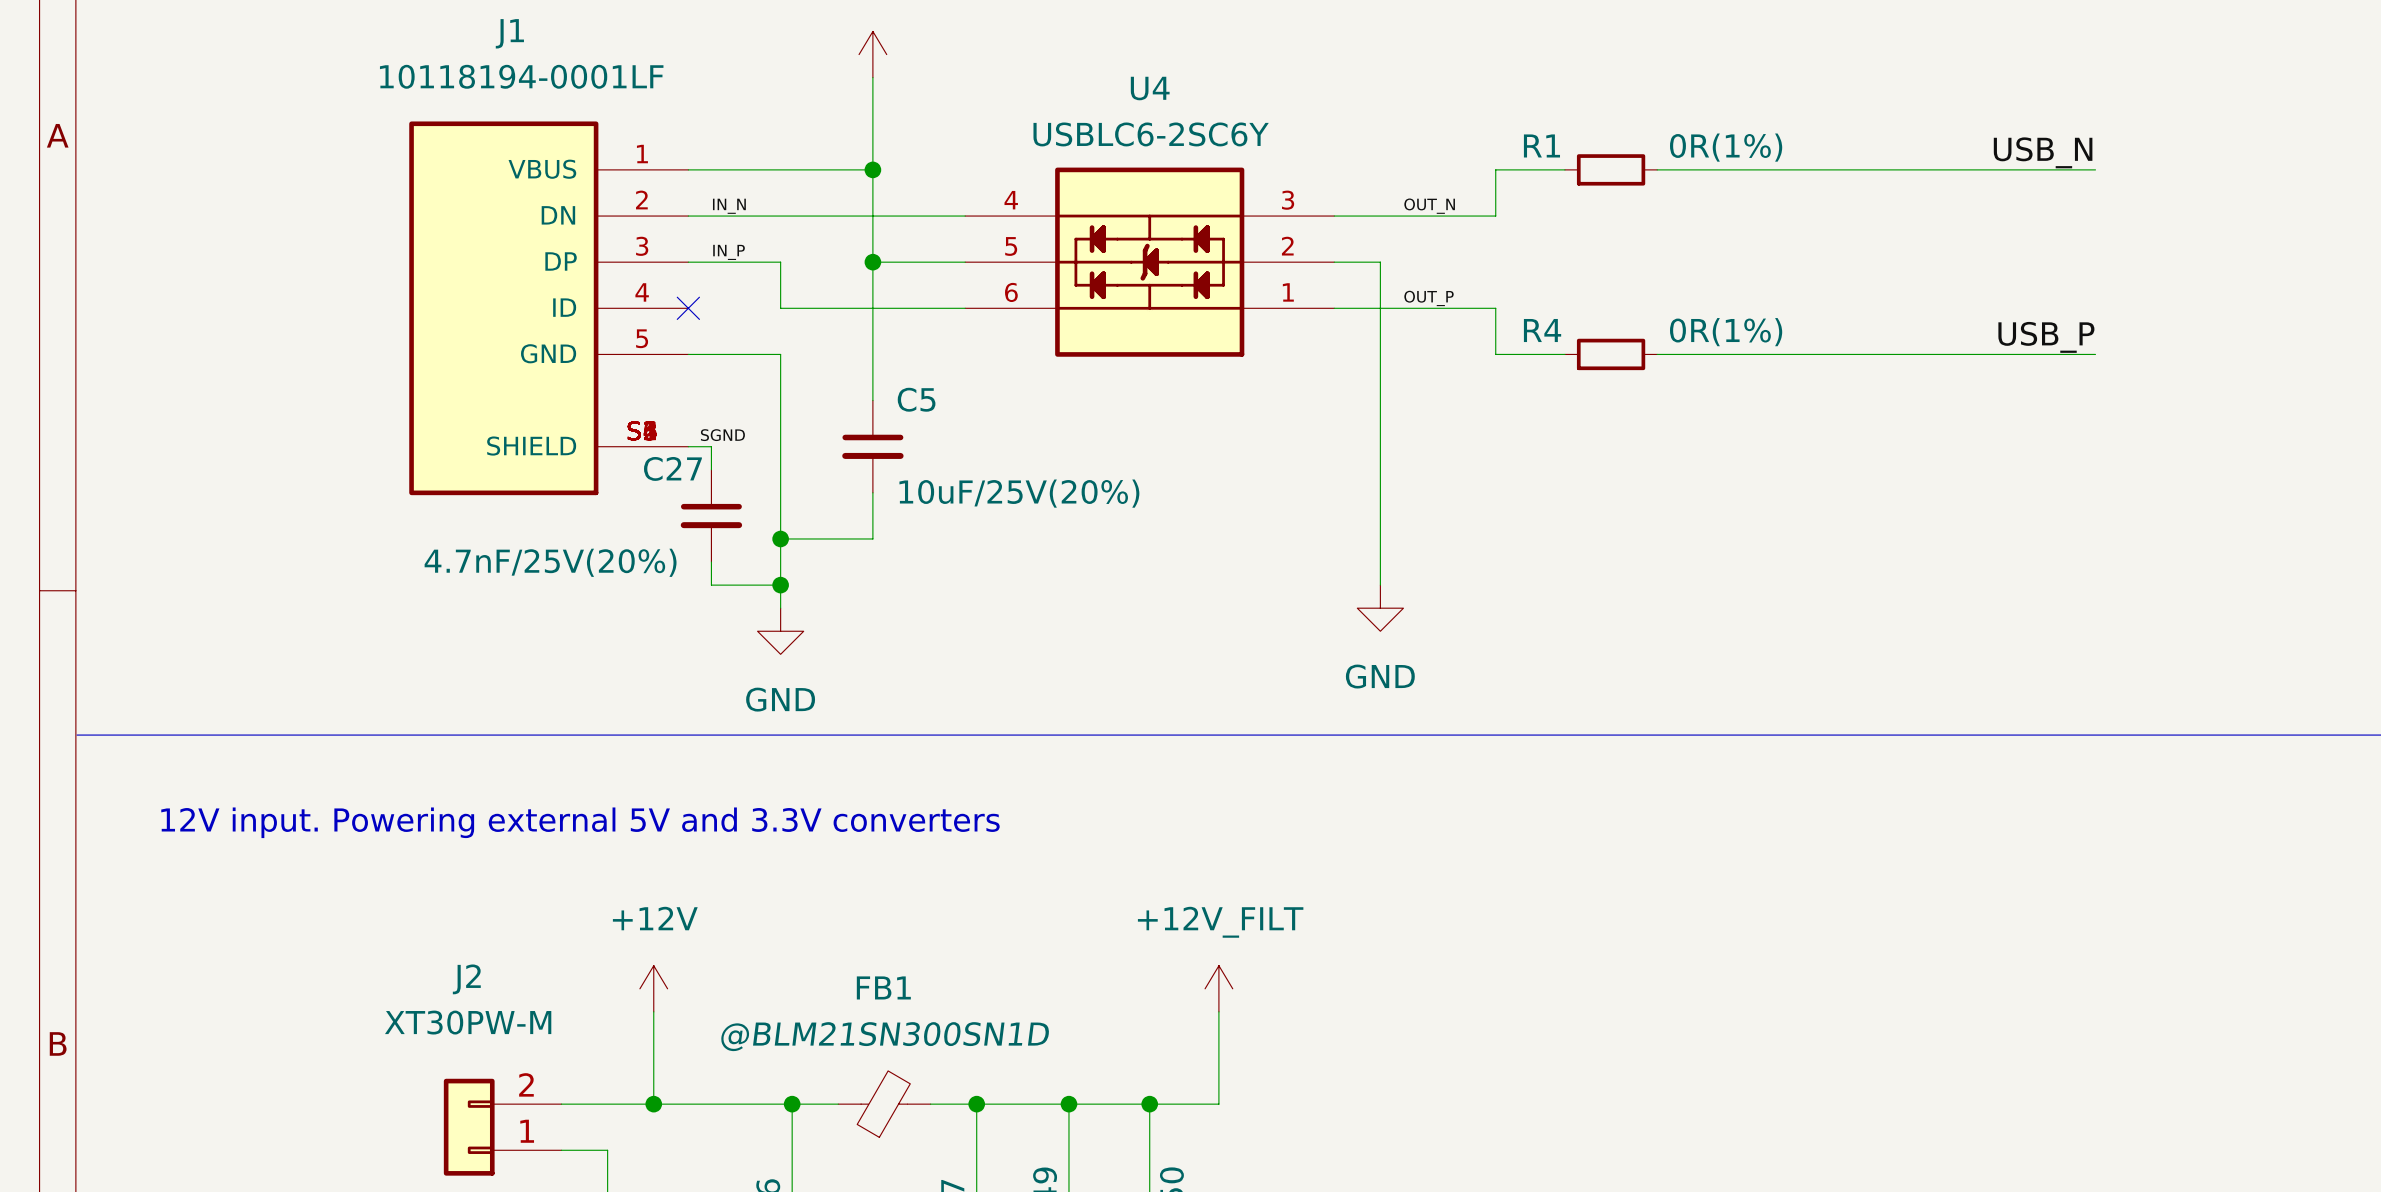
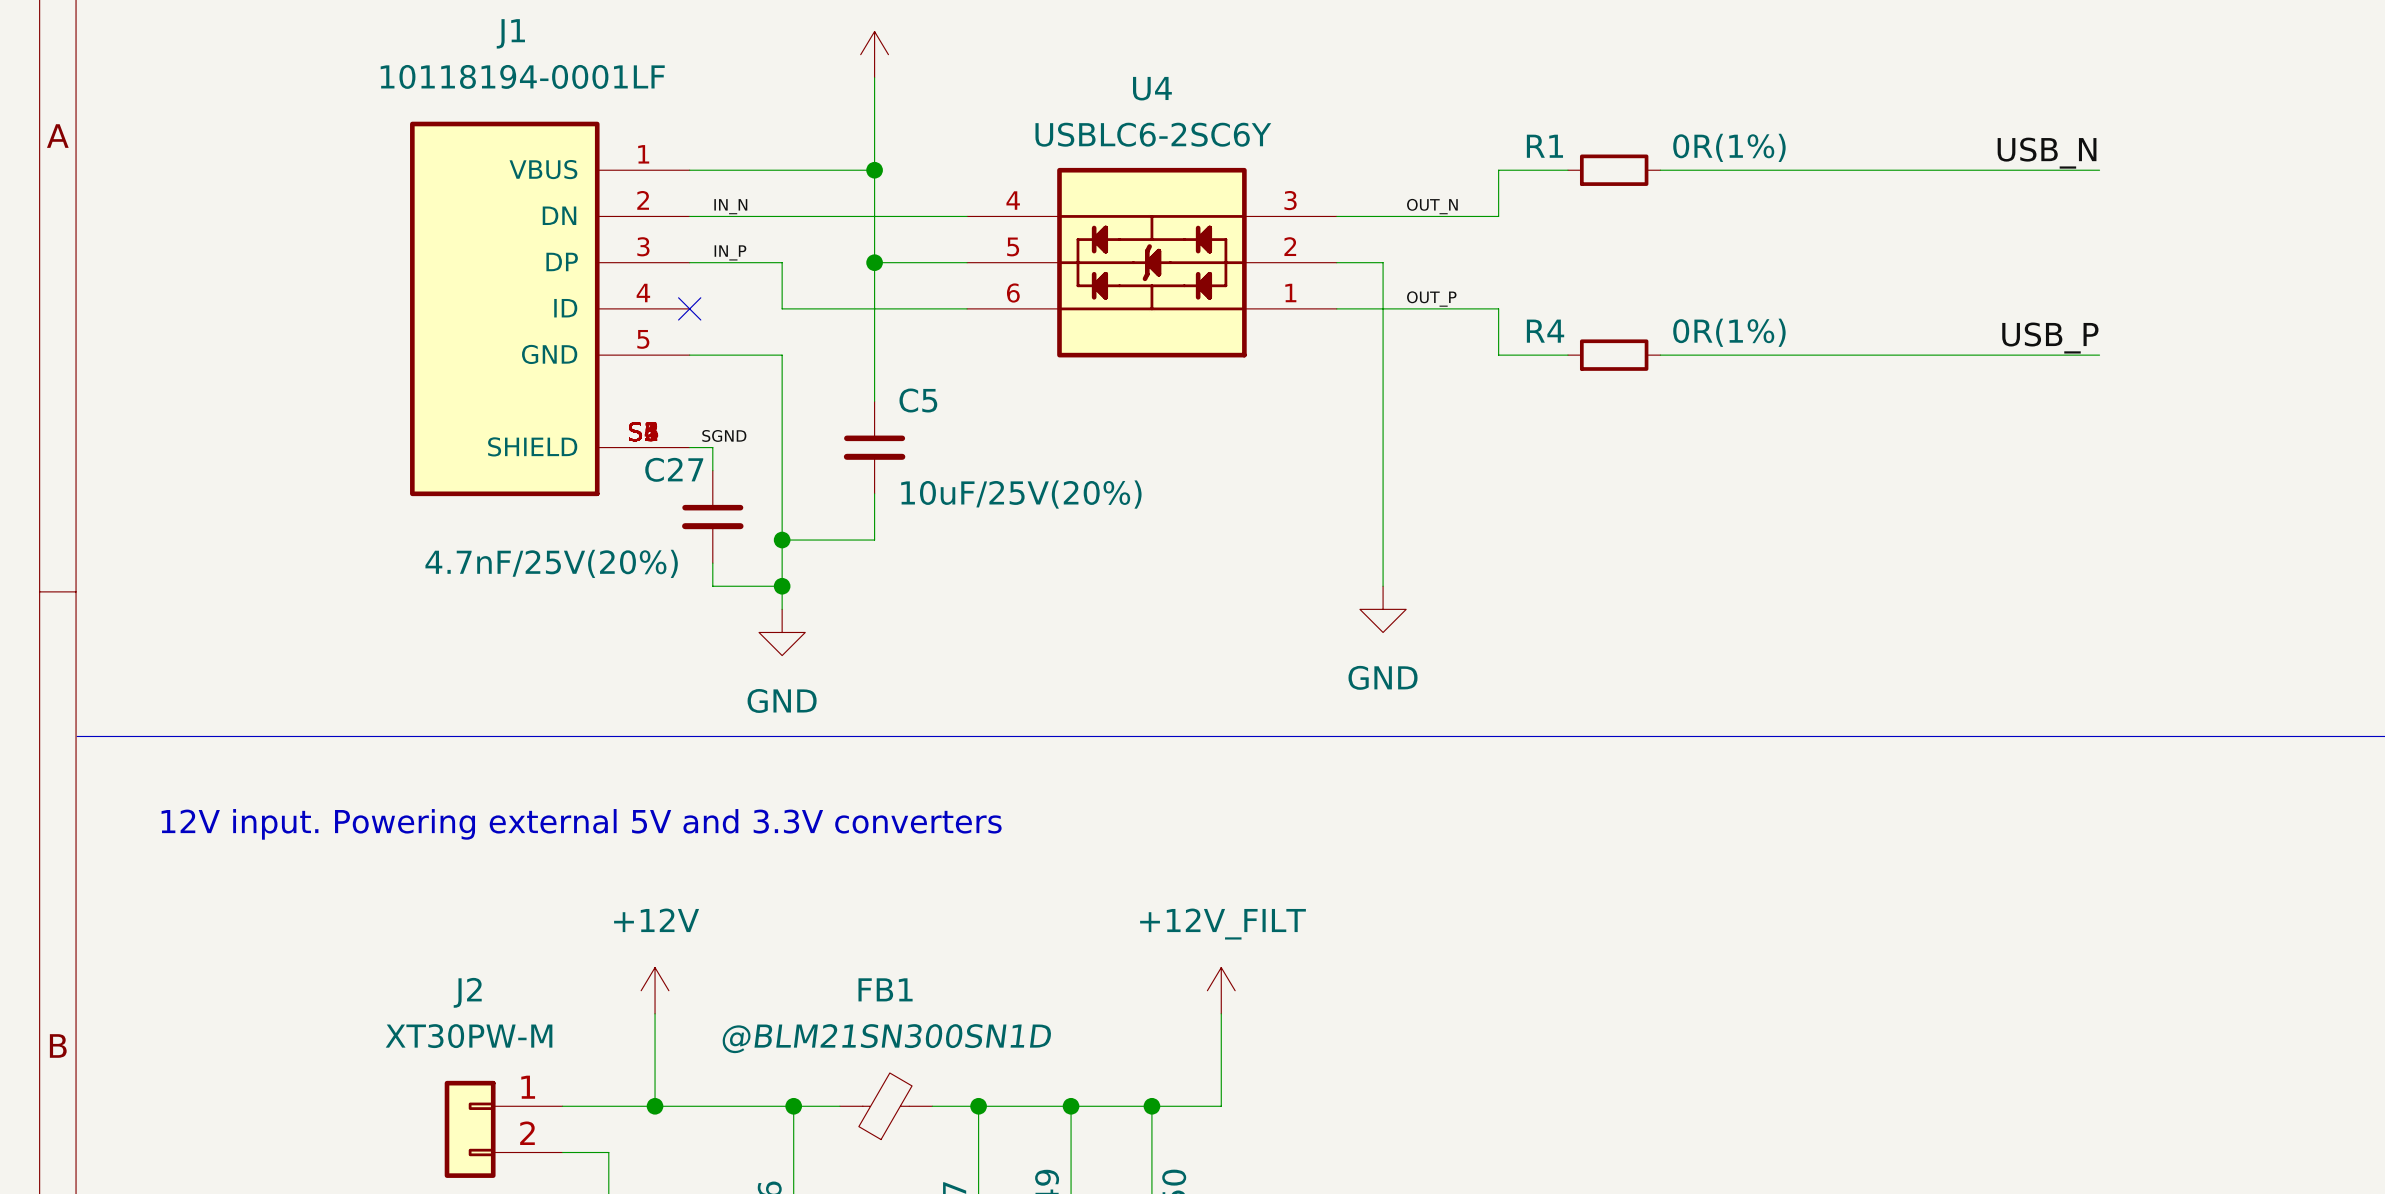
J2 flip: as is (469, 1127) -> up-down (470, 1129)

